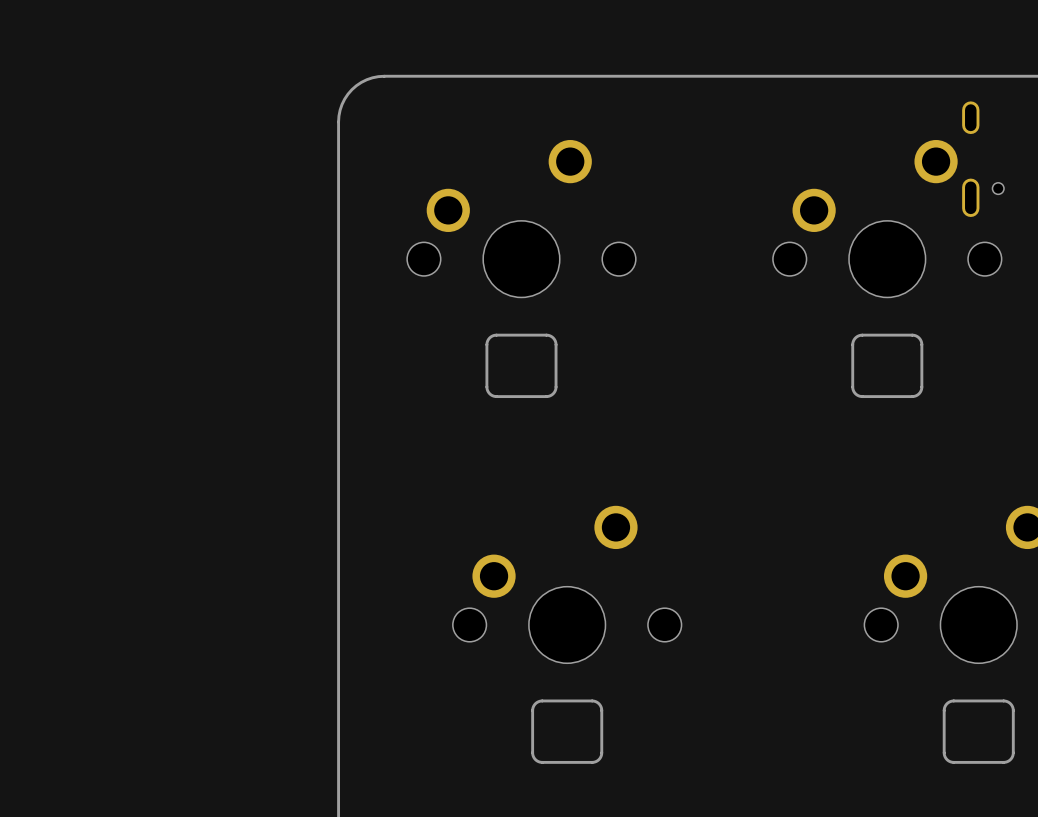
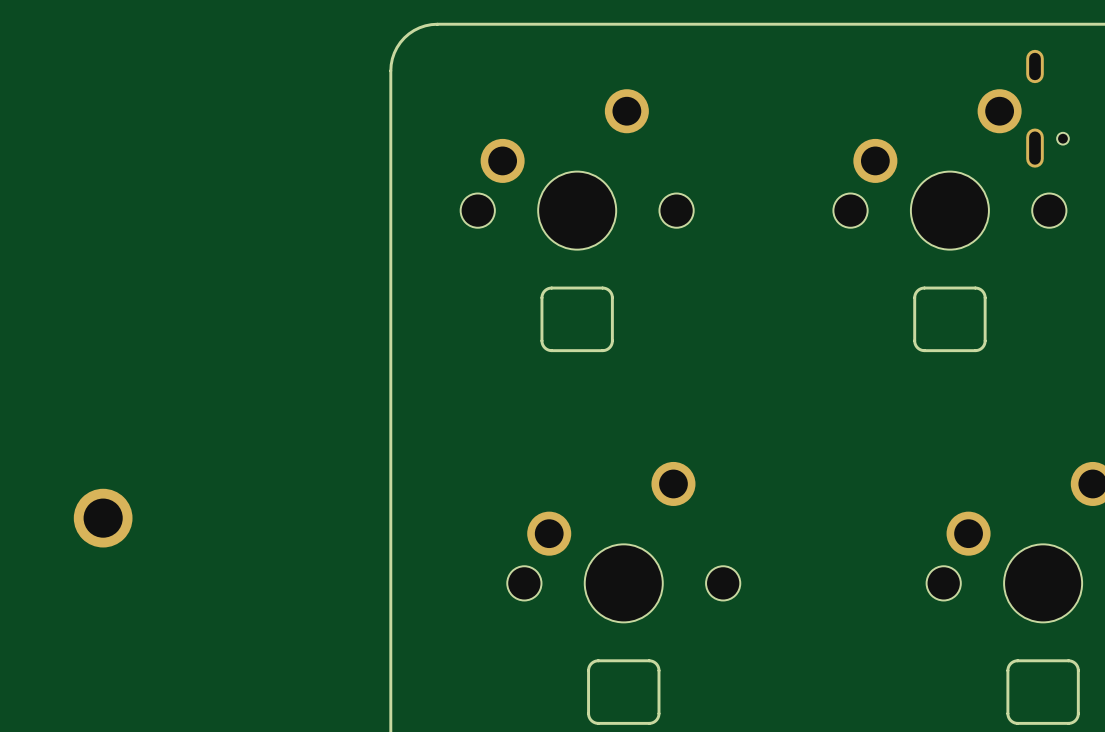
part: none -> (103, 518)

